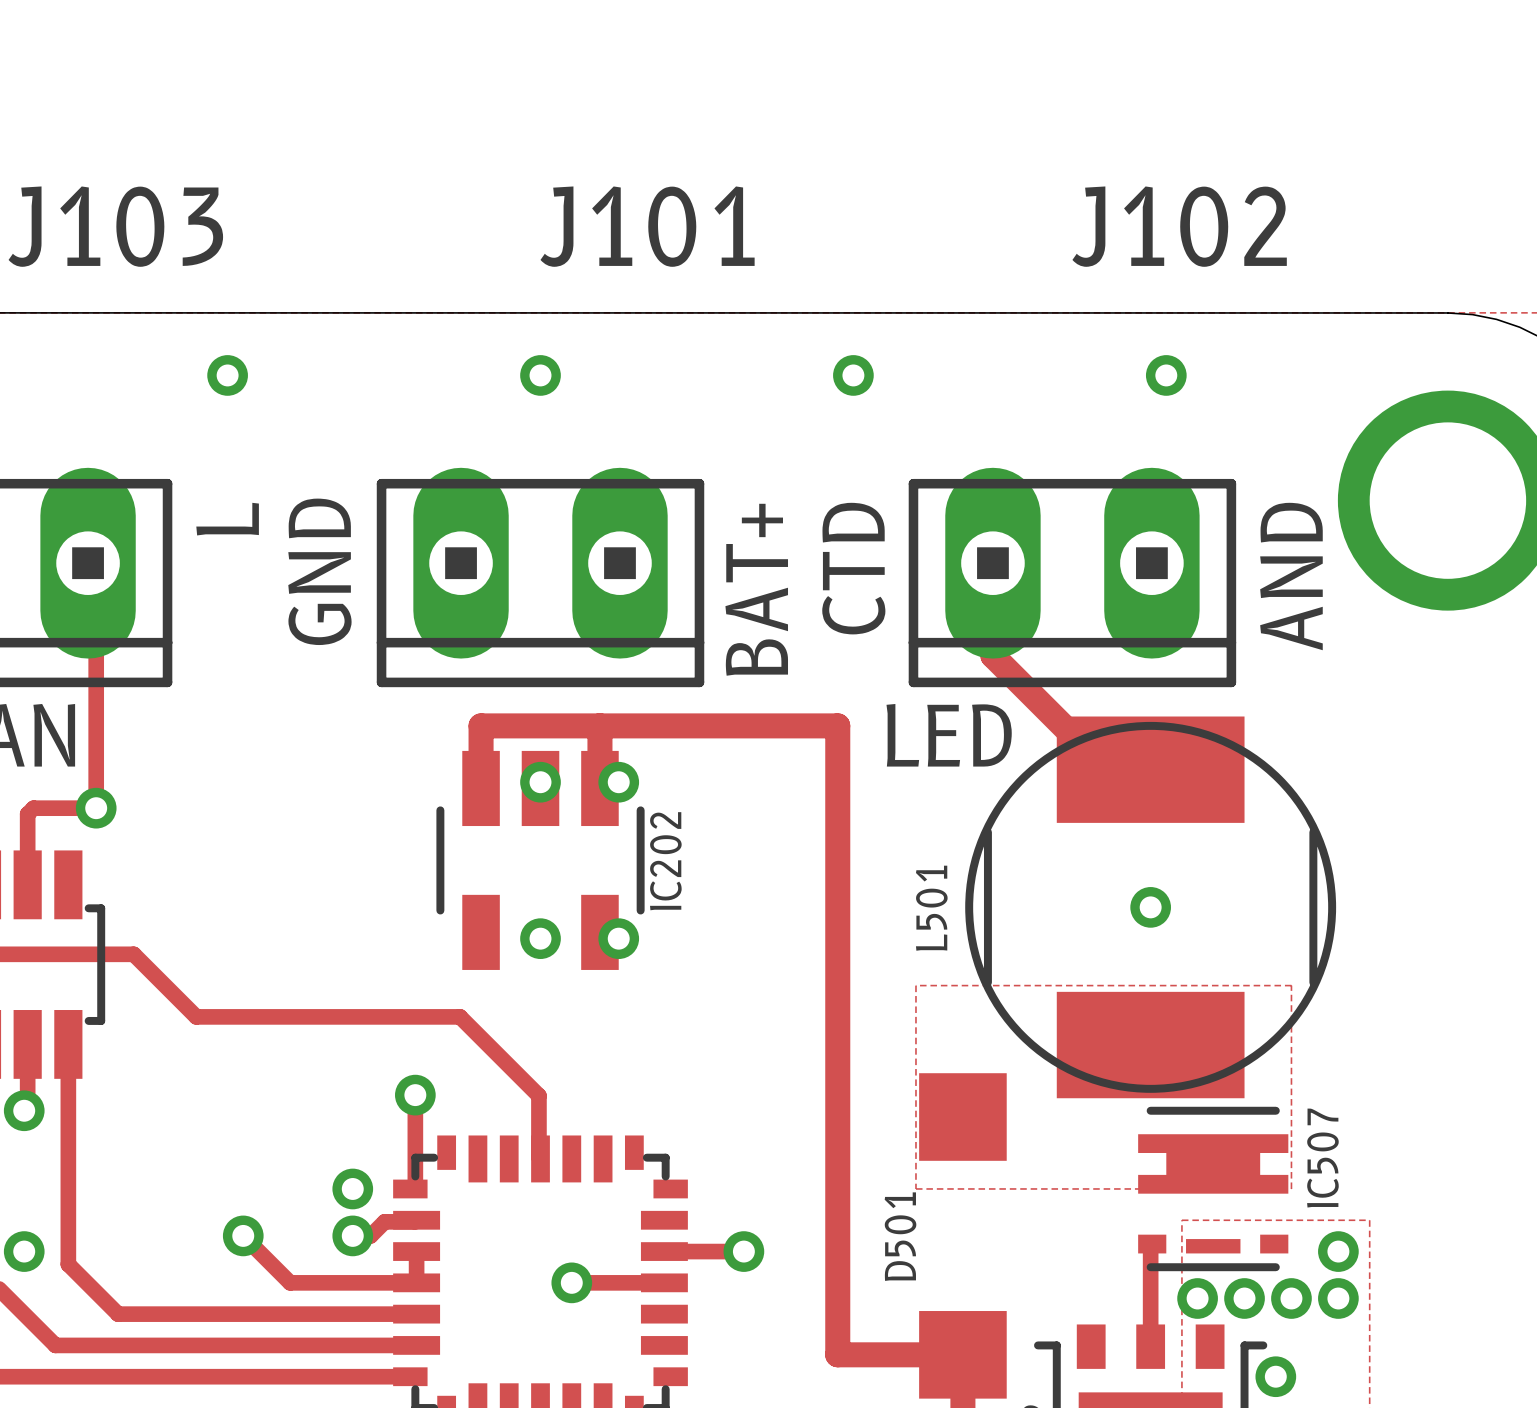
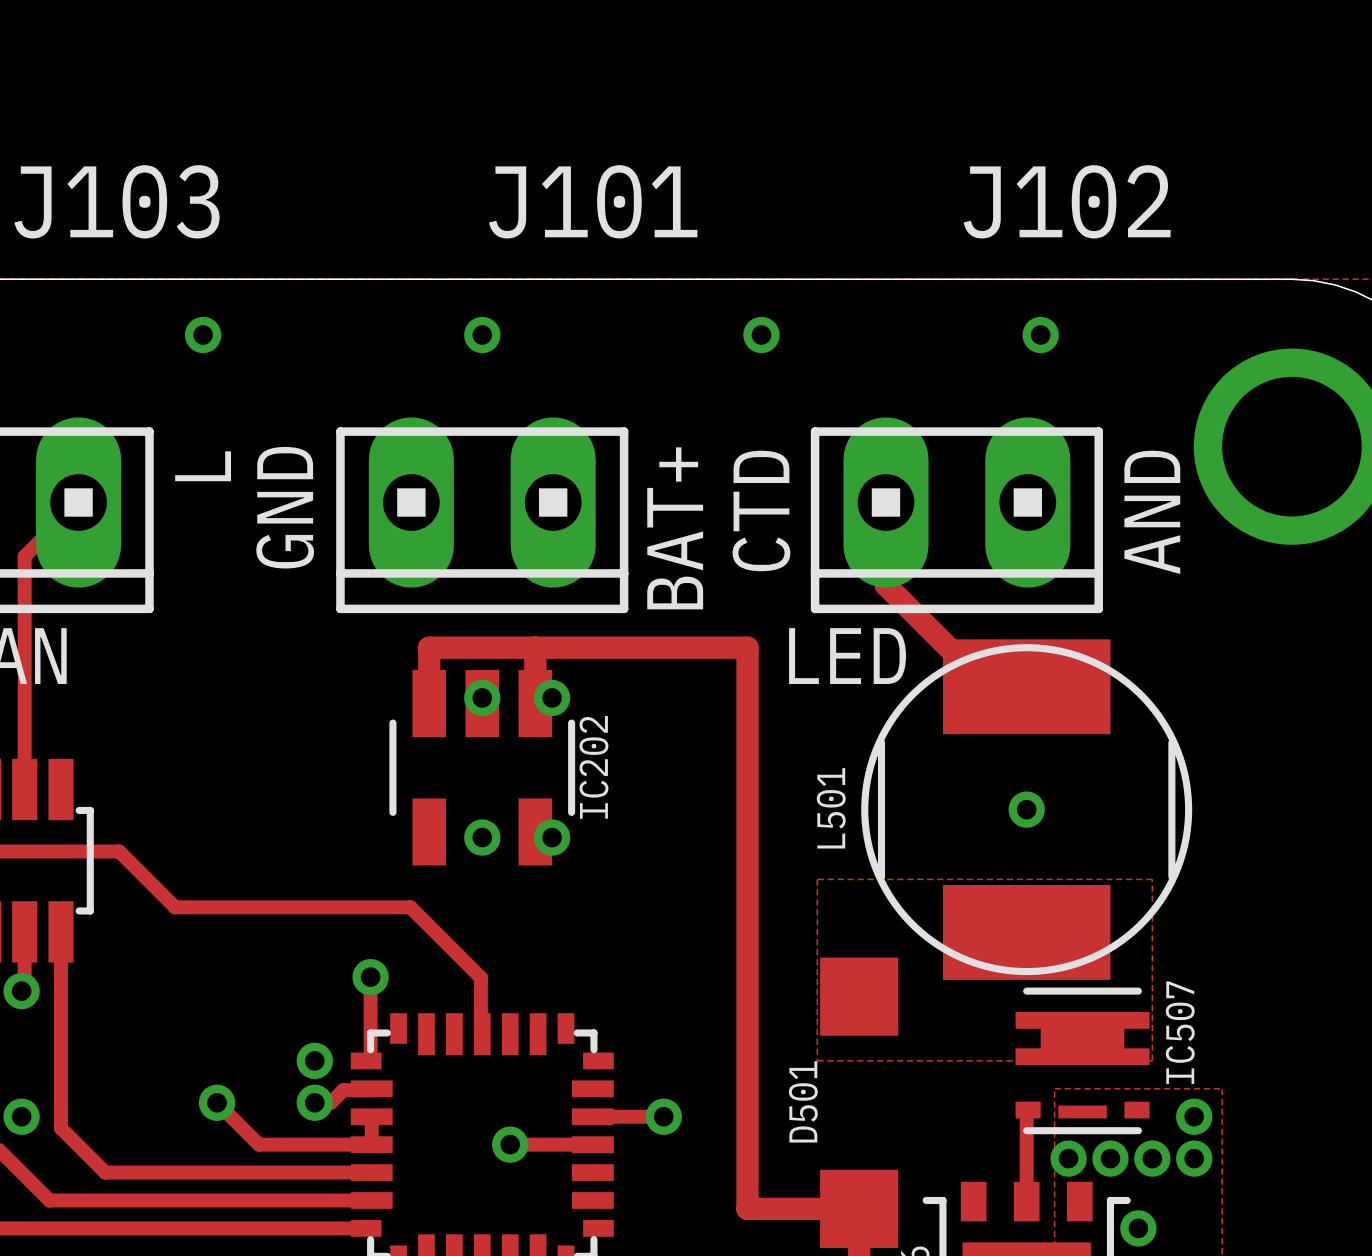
track: (88, 563) (96, 571) (96, 808) (33, 808) (27, 814) -> (78, 502) (24, 556) (24, 726)
via: (96, 808) -> none

